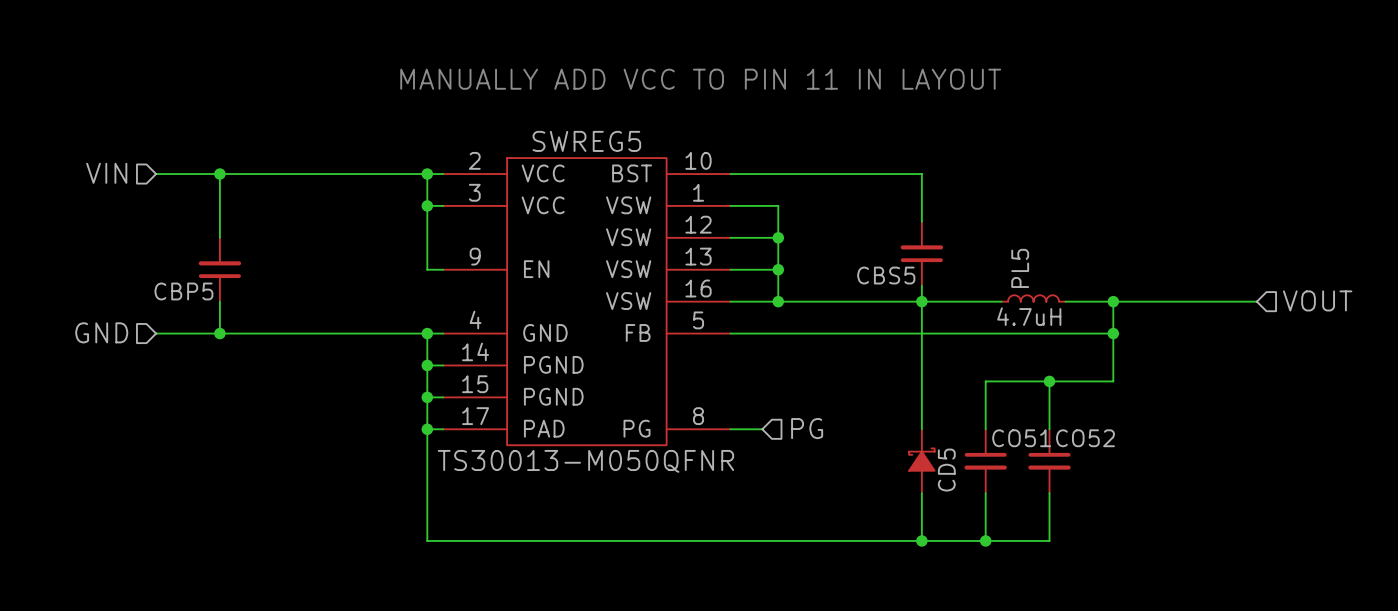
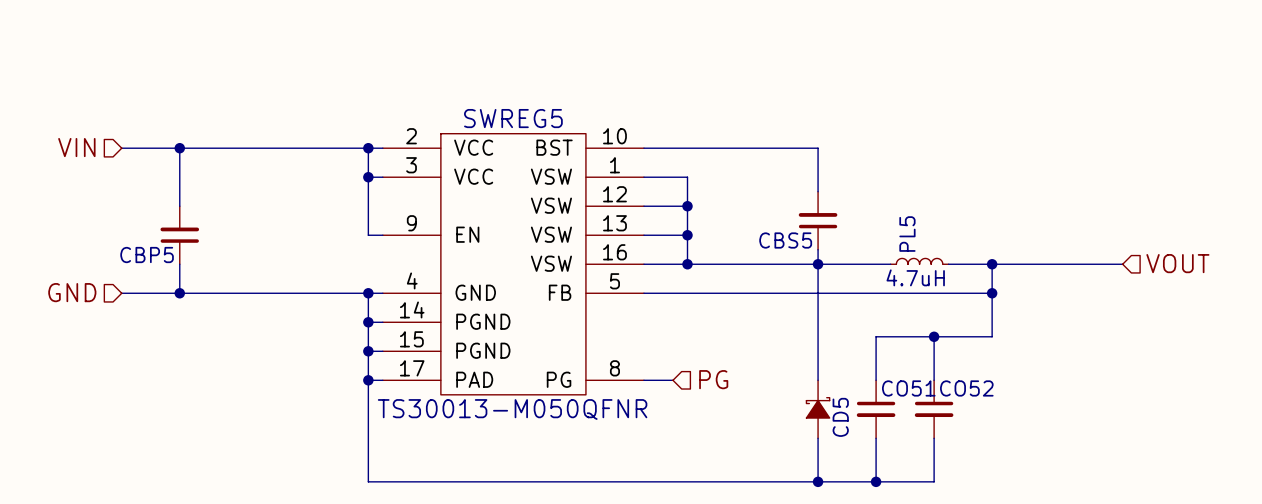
text: MANUALLY ADD VCC TO PIN 11 IN LAYOUT (700, 79) -> none

